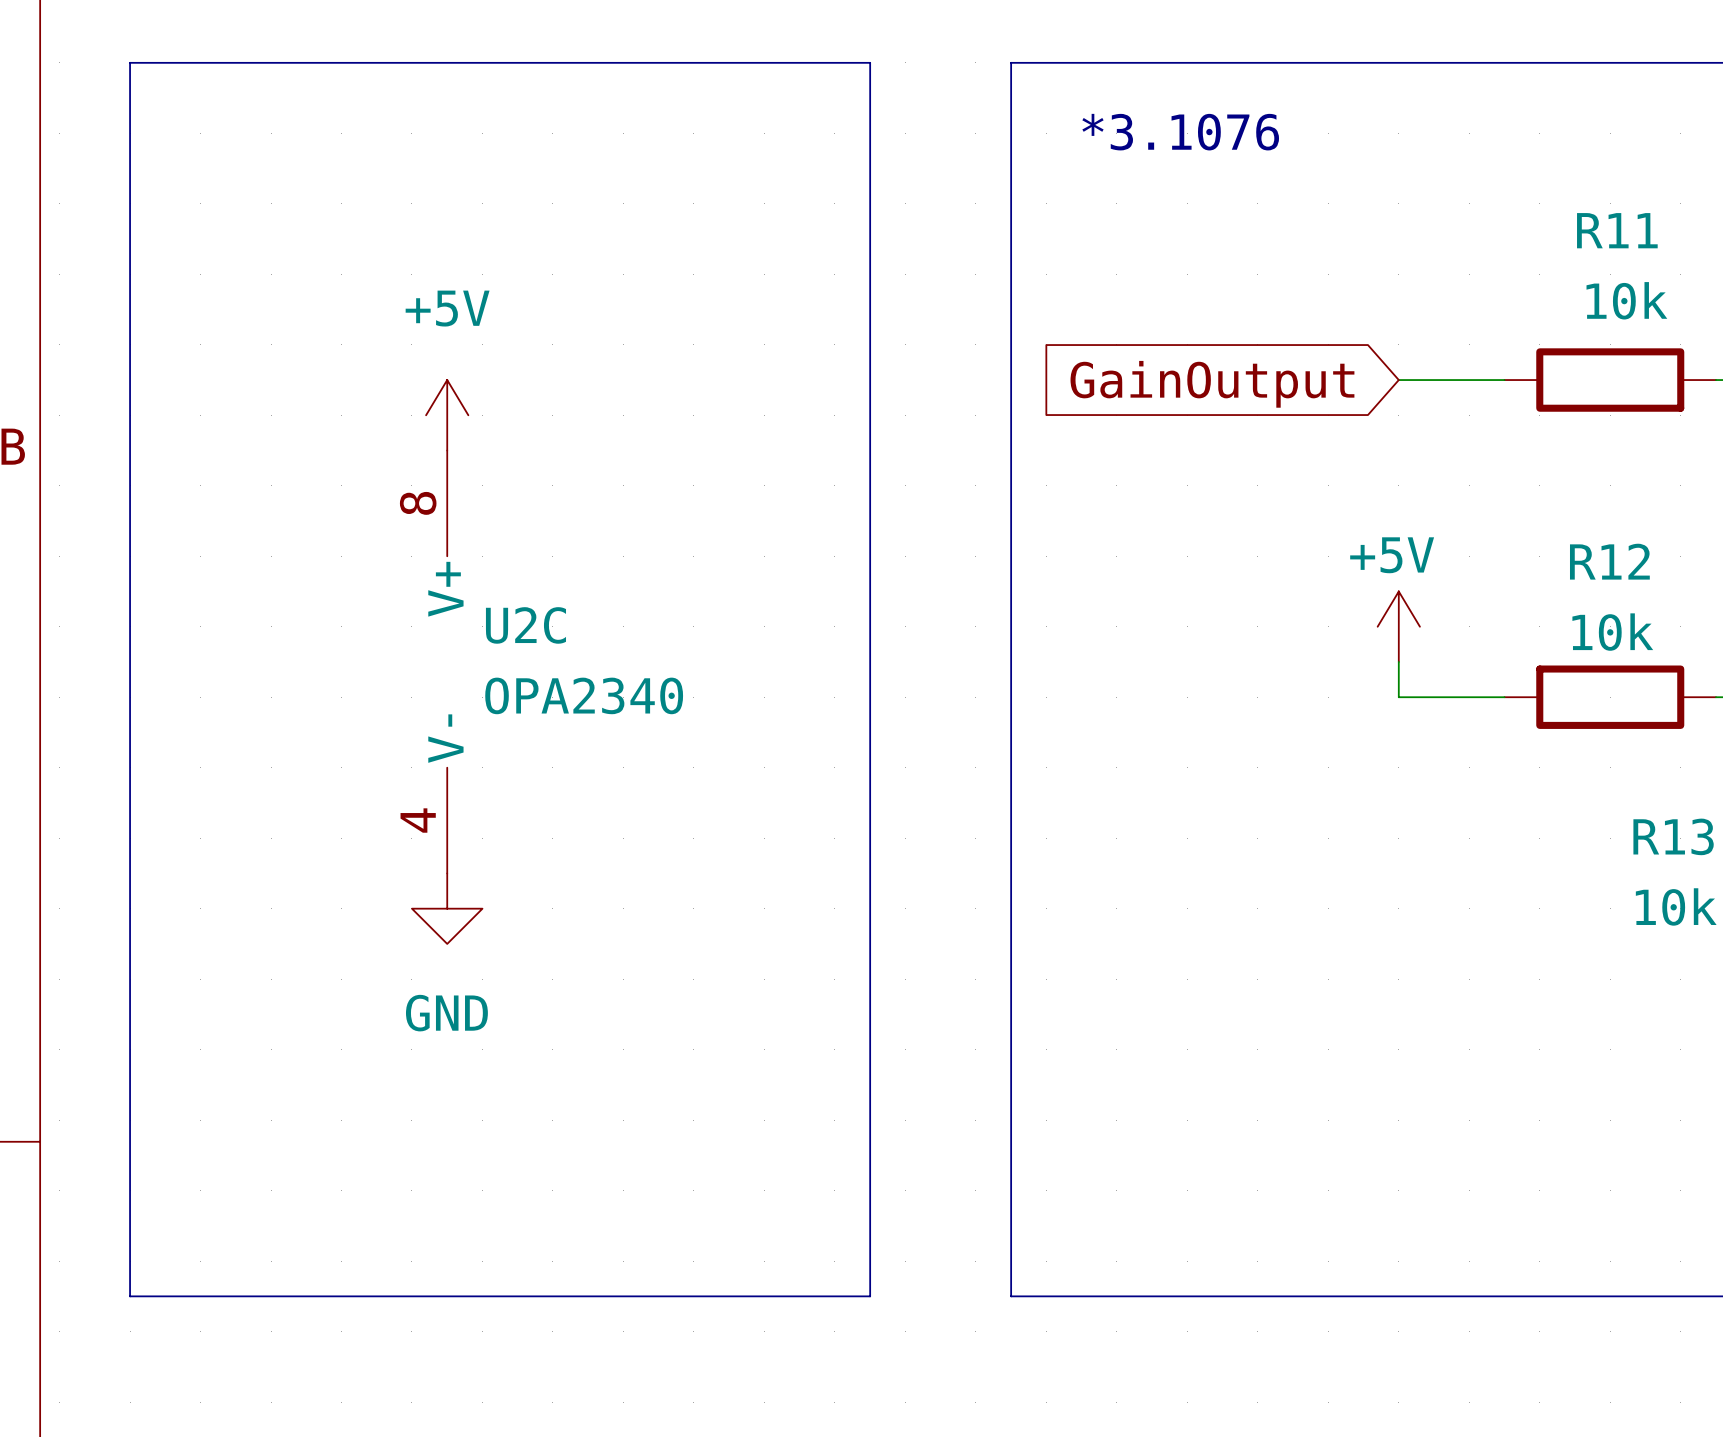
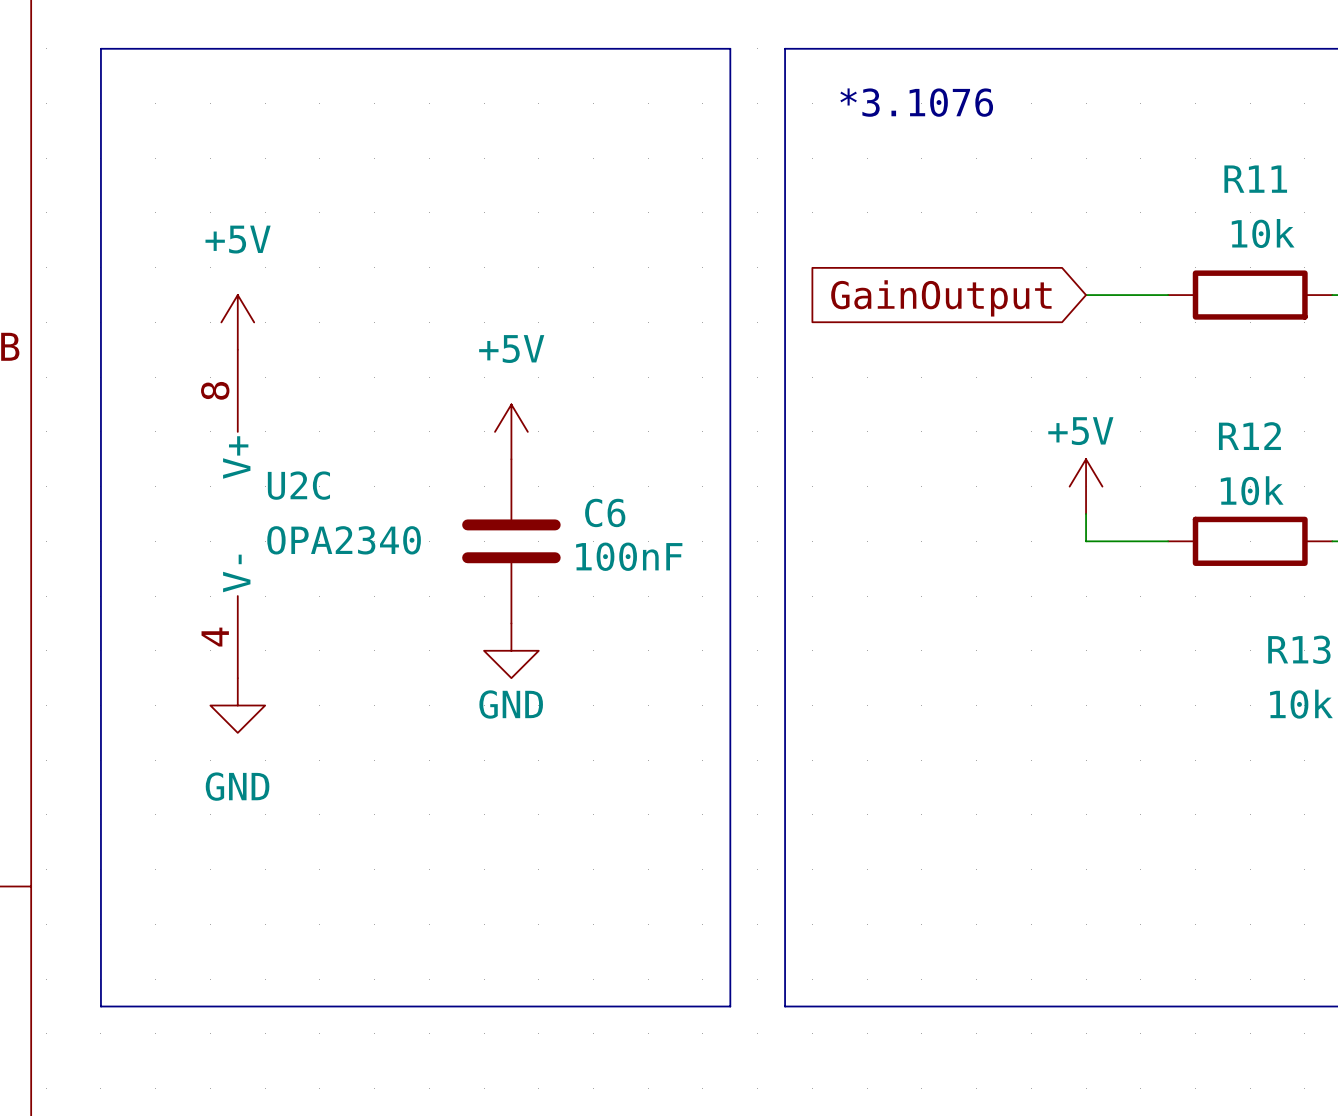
line: (870, 62) (870, 1296) -> (675, 48) (730, 48) (730, 1006) (675, 1006)
power symbol: none -> +5V (237, 322)
power symbol: +5V (447, 415) -> none
power symbol: none -> +5V (511, 431)
U2C position: (447, 661) -> (237, 513)
C6: none -> 100nF (511, 541)
power symbol: none -> GND (511, 650)
power symbol: none -> GND (237, 705)
power symbol: GND (447, 908) -> none

